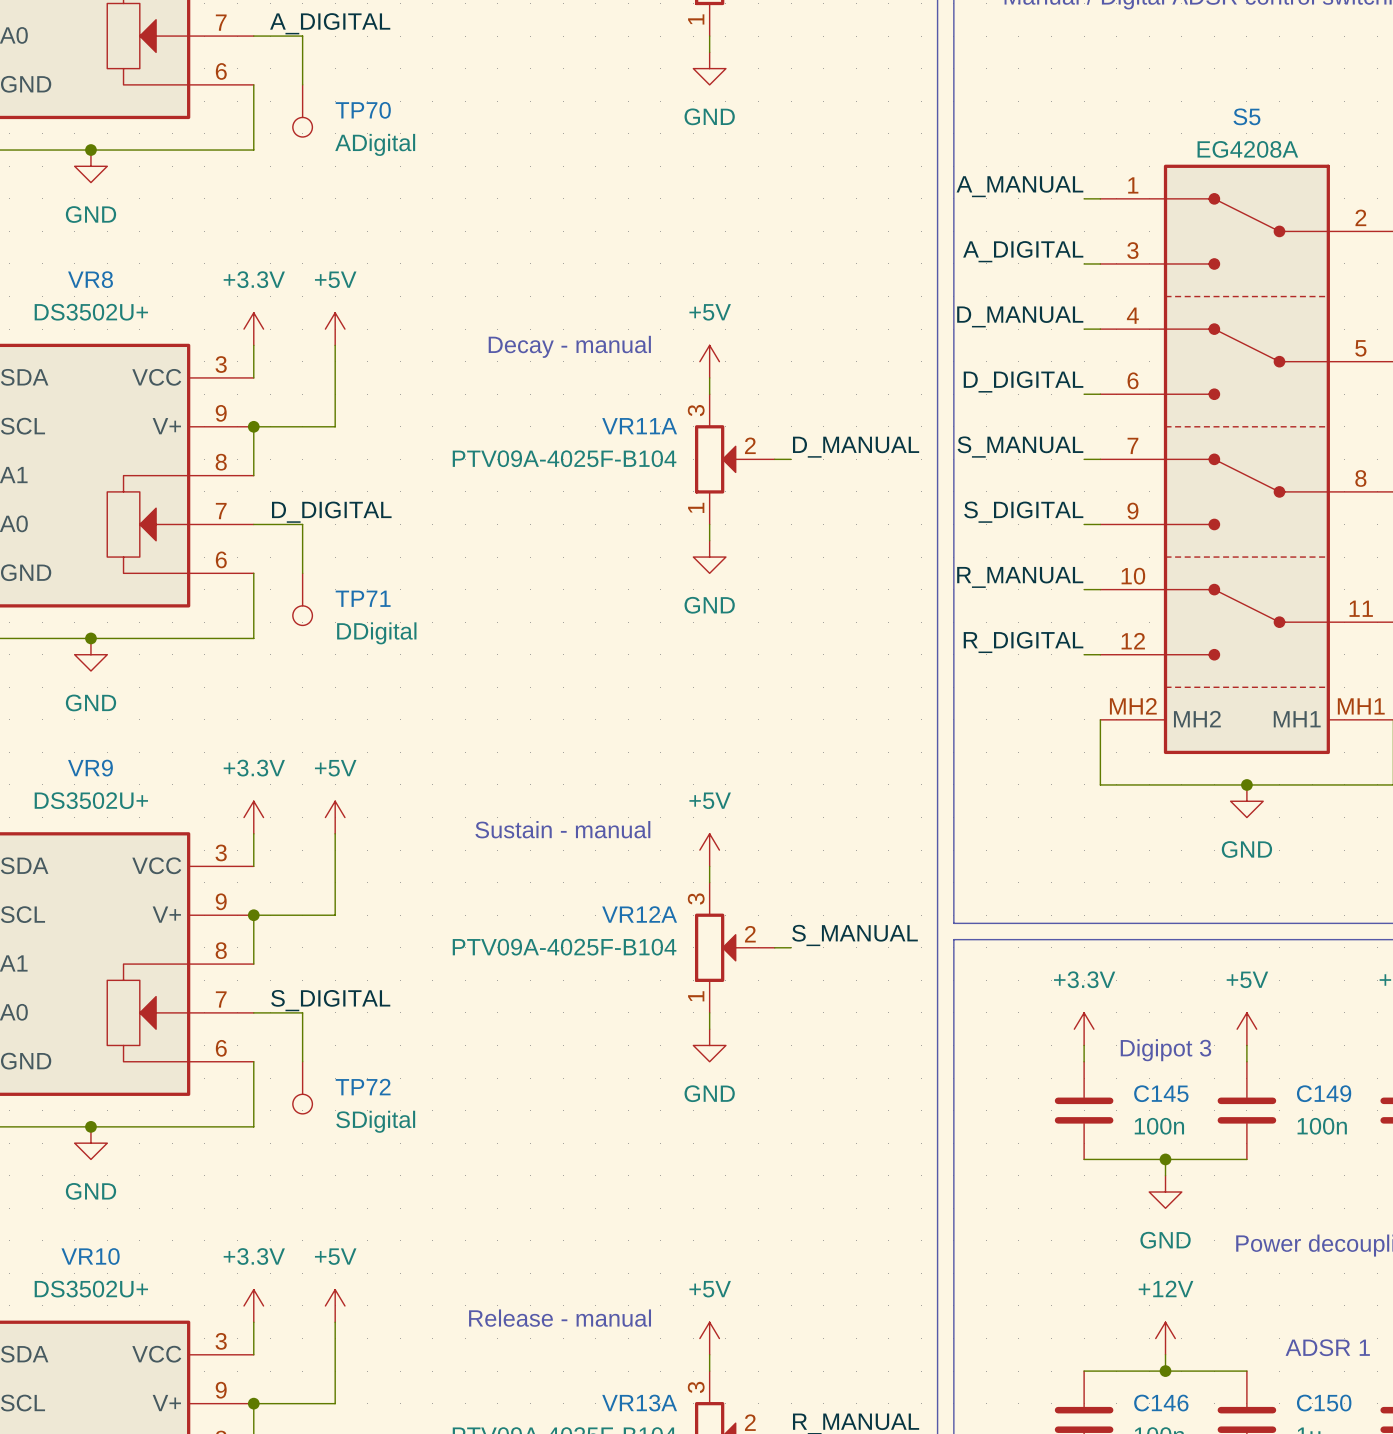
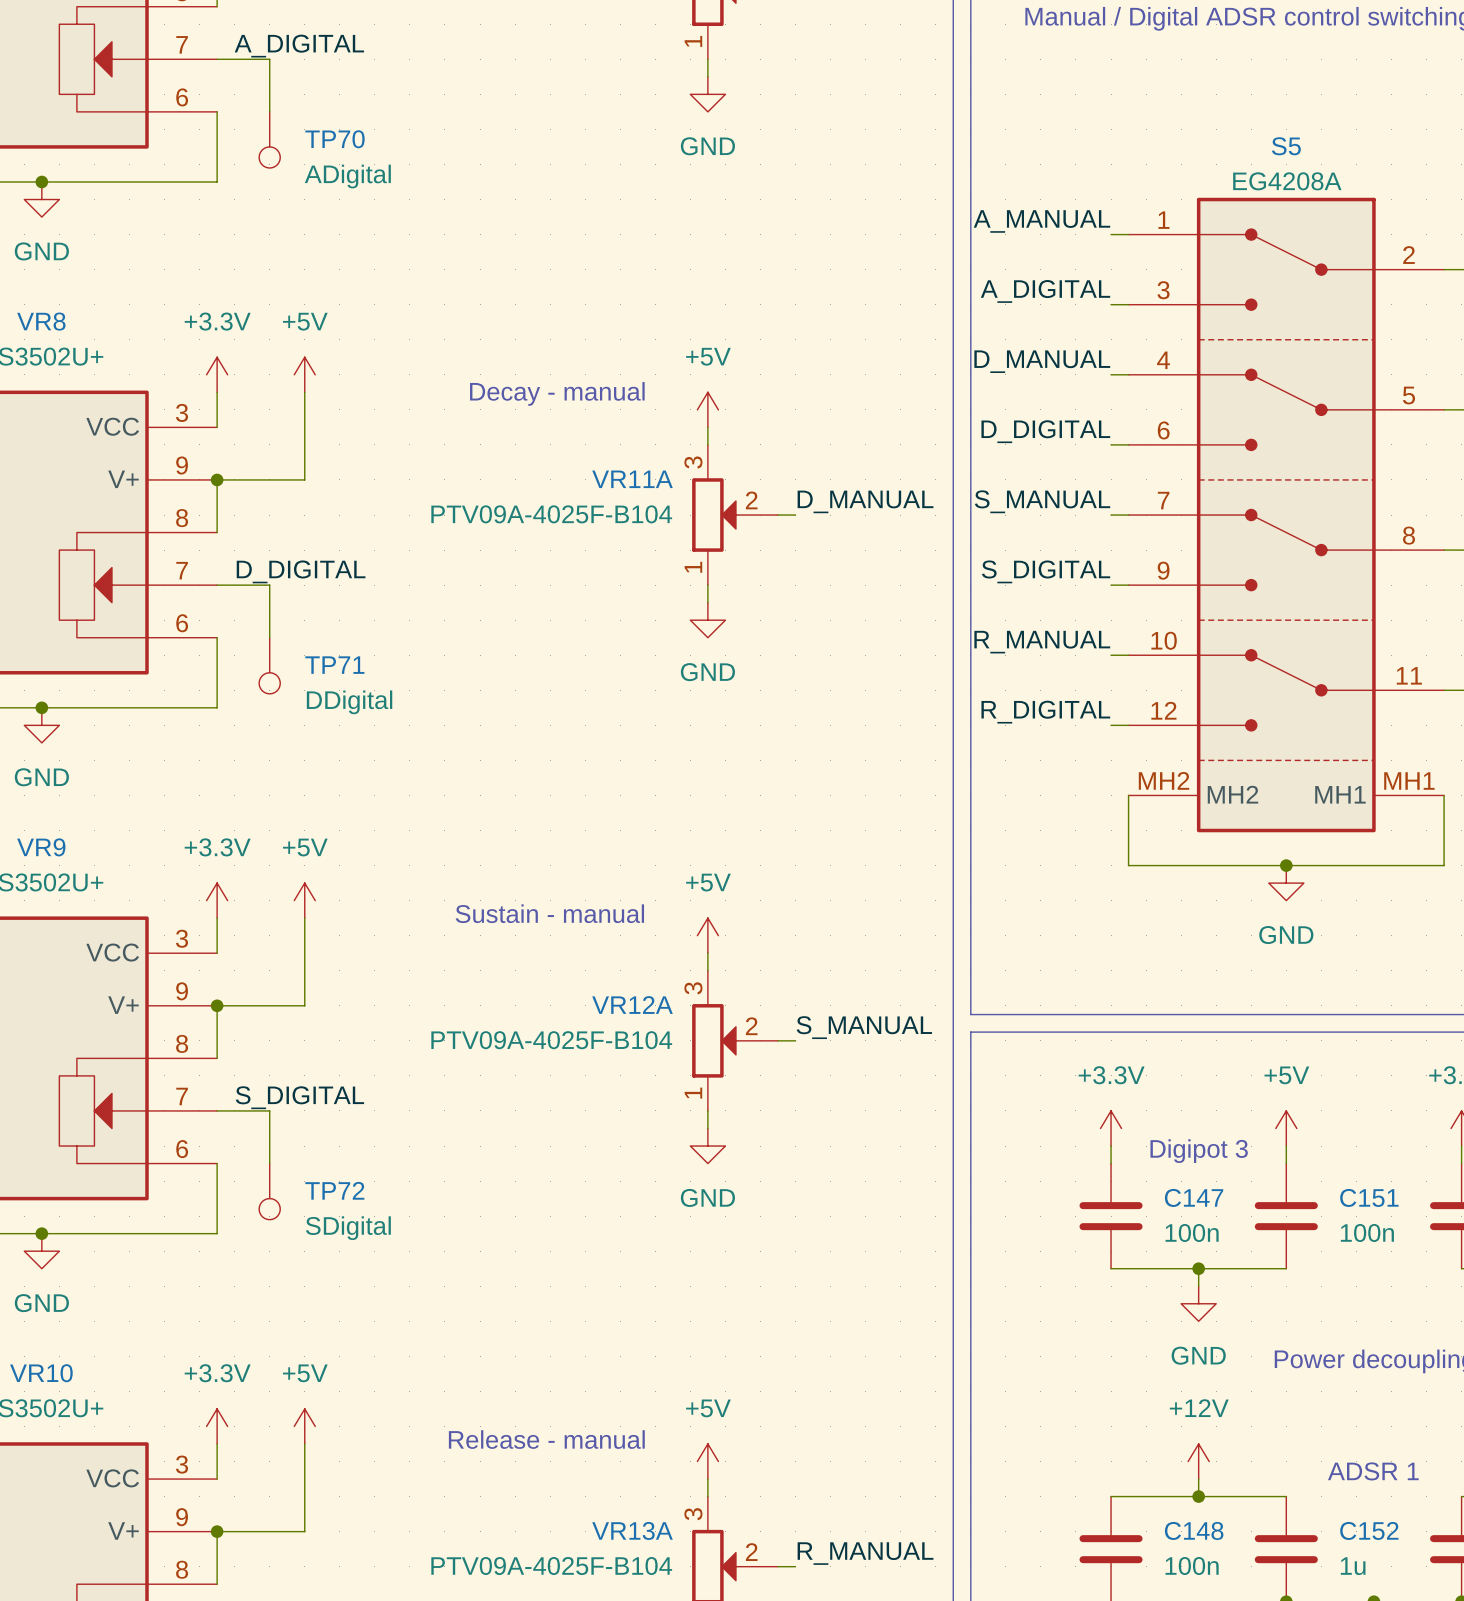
C145 name: C145 (1161, 1093) -> C147 (1194, 1197)
C149 name: C149 (1324, 1093) -> C151 (1369, 1197)
C146 name: C146 (1161, 1403) -> C148 (1194, 1530)
C150 name: C150 (1324, 1403) -> C152 (1369, 1530)

